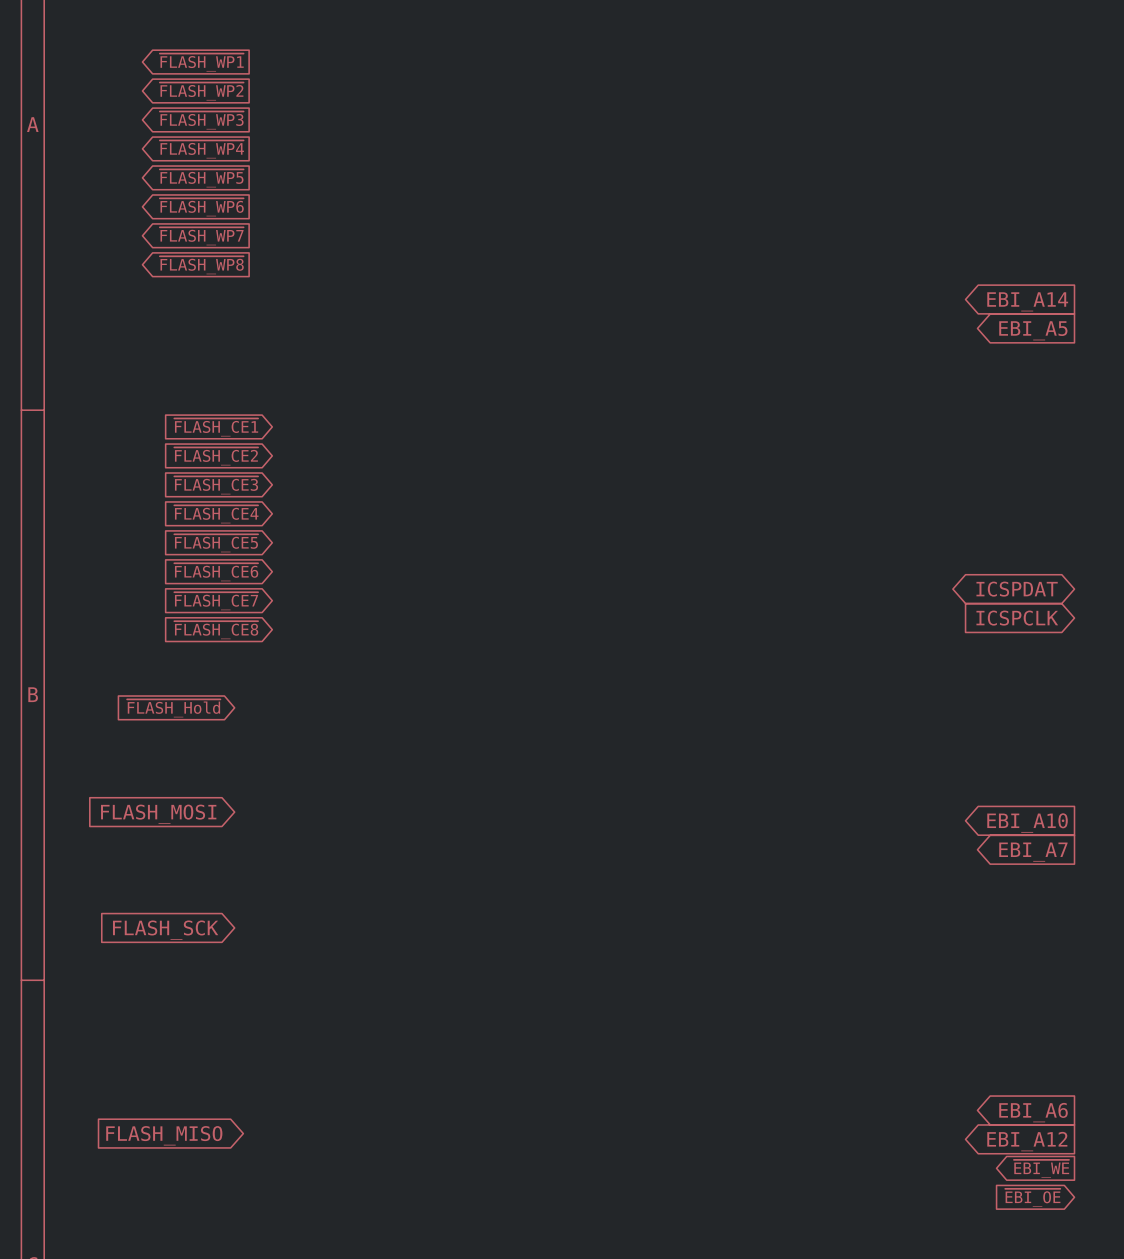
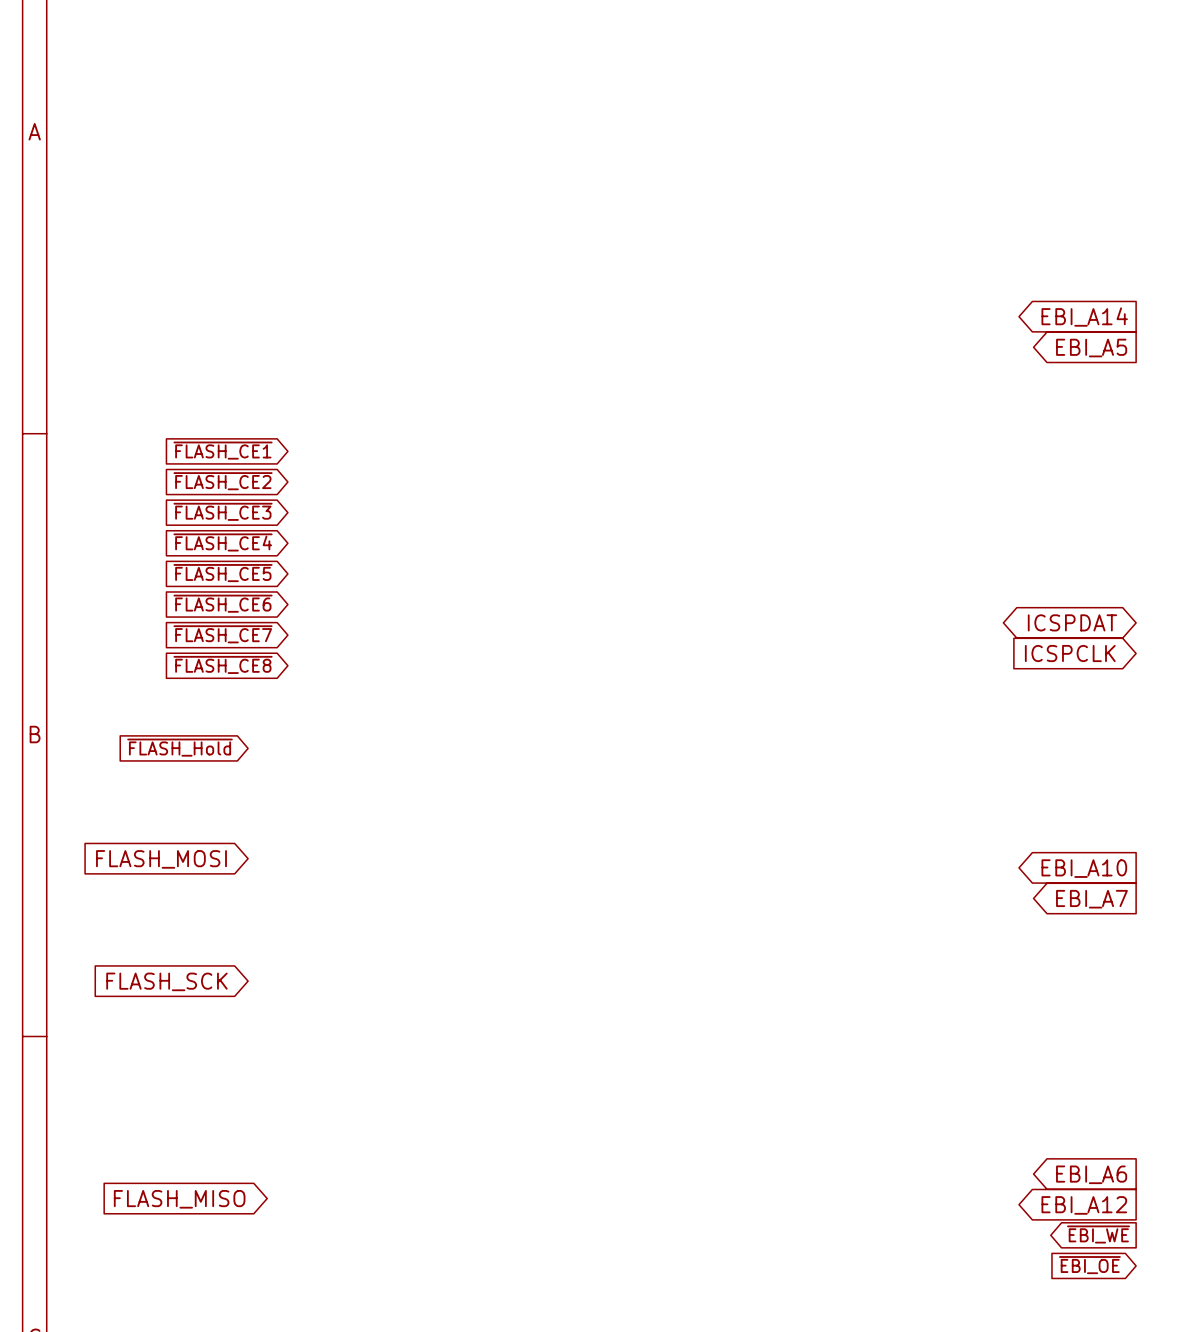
global label: ~{FLASH_WP1} (201, 62) -> none
global label: ~{FLASH_WP2} (201, 91) -> none
global label: ~{FLASH_WP3} (201, 120) -> none
global label: ~{FLASH_WP4} (201, 149) -> none
global label: ~{FLASH_WP5} (201, 178) -> none
global label: ~{FLASH_WP6} (201, 207) -> none
global label: ~{FLASH_WP7} (201, 236) -> none
global label: ~{FLASH_WP8} (201, 265) -> none

